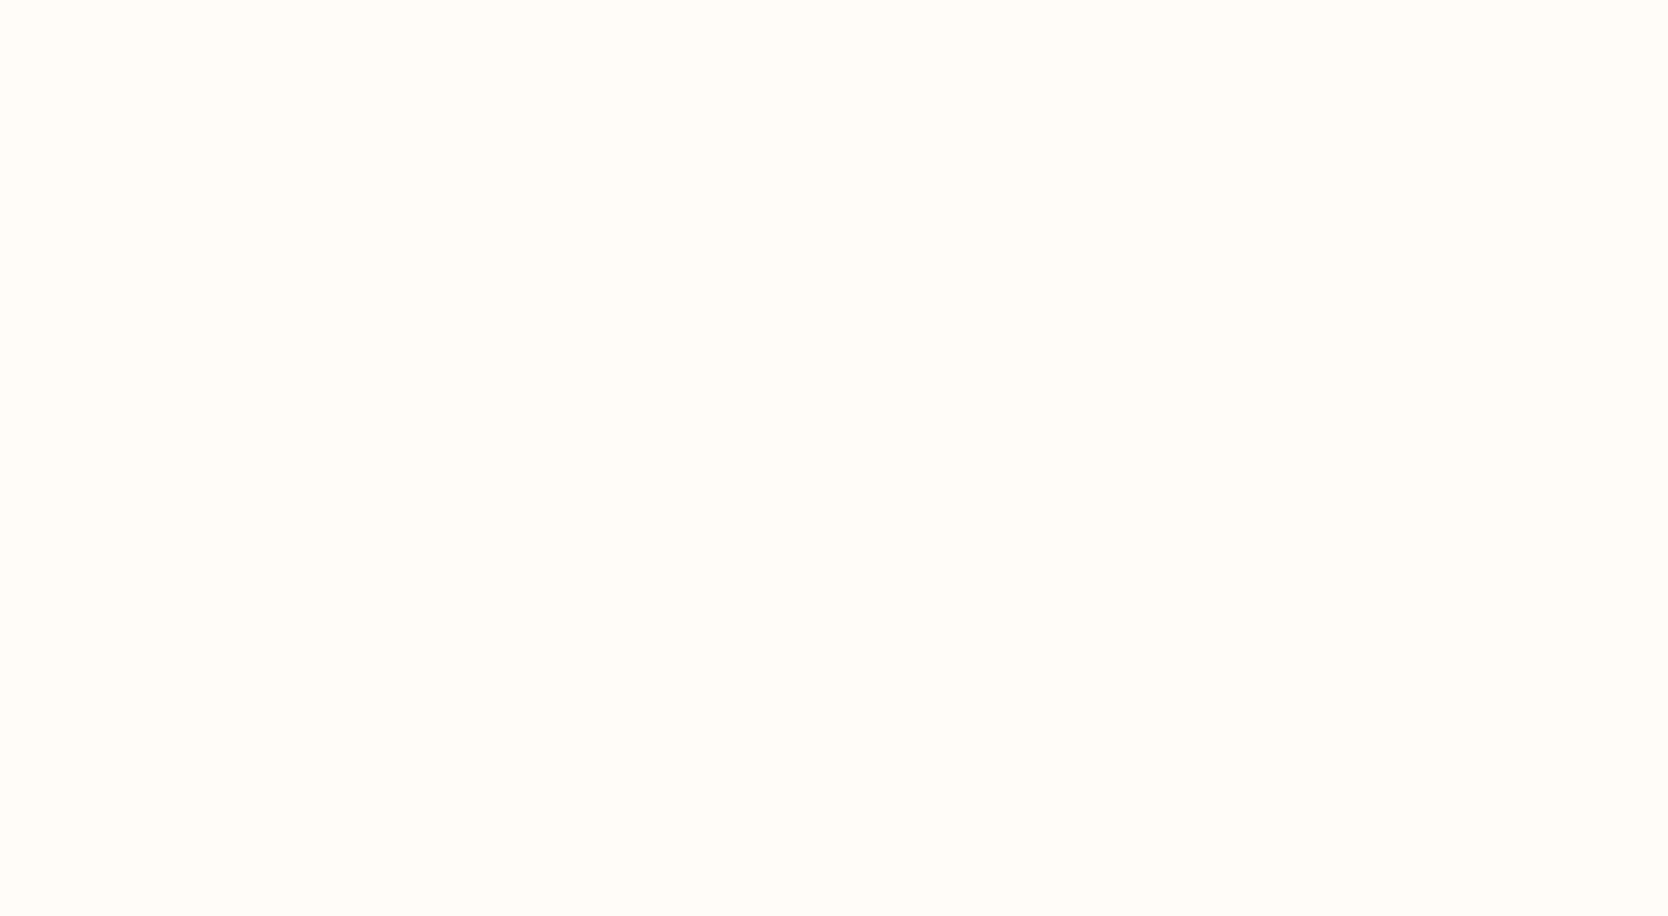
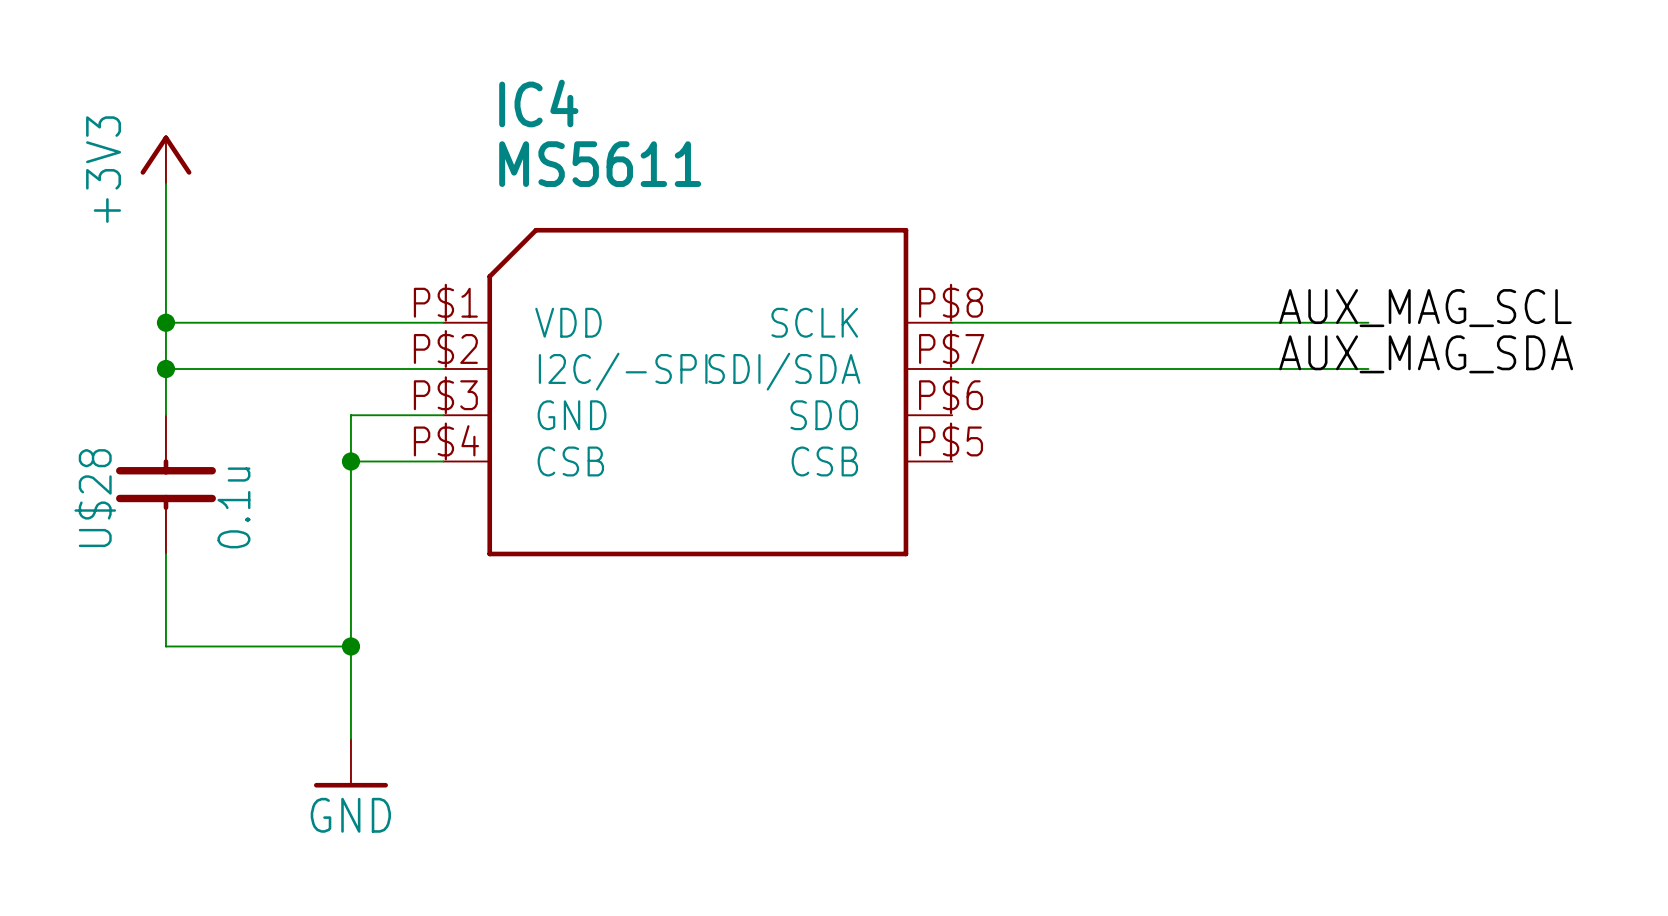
text: none -> IC4 (538, 103)
power symbol: none -> +3V3 (165, 159)
text: none -> MS5611 (600, 164)
wire: none -> (165, 184) (165, 415)
label: none -> AUX_MAG_SCL (1425, 308)
wire: none -> (165, 322) (443, 322)
junction: none -> (165, 322)
wire: none -> (952, 322) (1368, 322)
label: none -> AUX_MAG_SDA (1426, 354)
wire: none -> (165, 368) (443, 368)
junction: none -> (165, 368)
wire: none -> (952, 368) (1368, 368)
part: none -> (697, 392)
wire: none -> (443, 415) (350, 415) (350, 738)
wire: none -> (350, 461) (443, 461)
junction: none -> (350, 461)
U$28: none -> 0.1u (165, 484)
wire: none -> (165, 553) (165, 646) (350, 646)
junction: none -> (350, 646)
power symbol: none -> GND (350, 763)

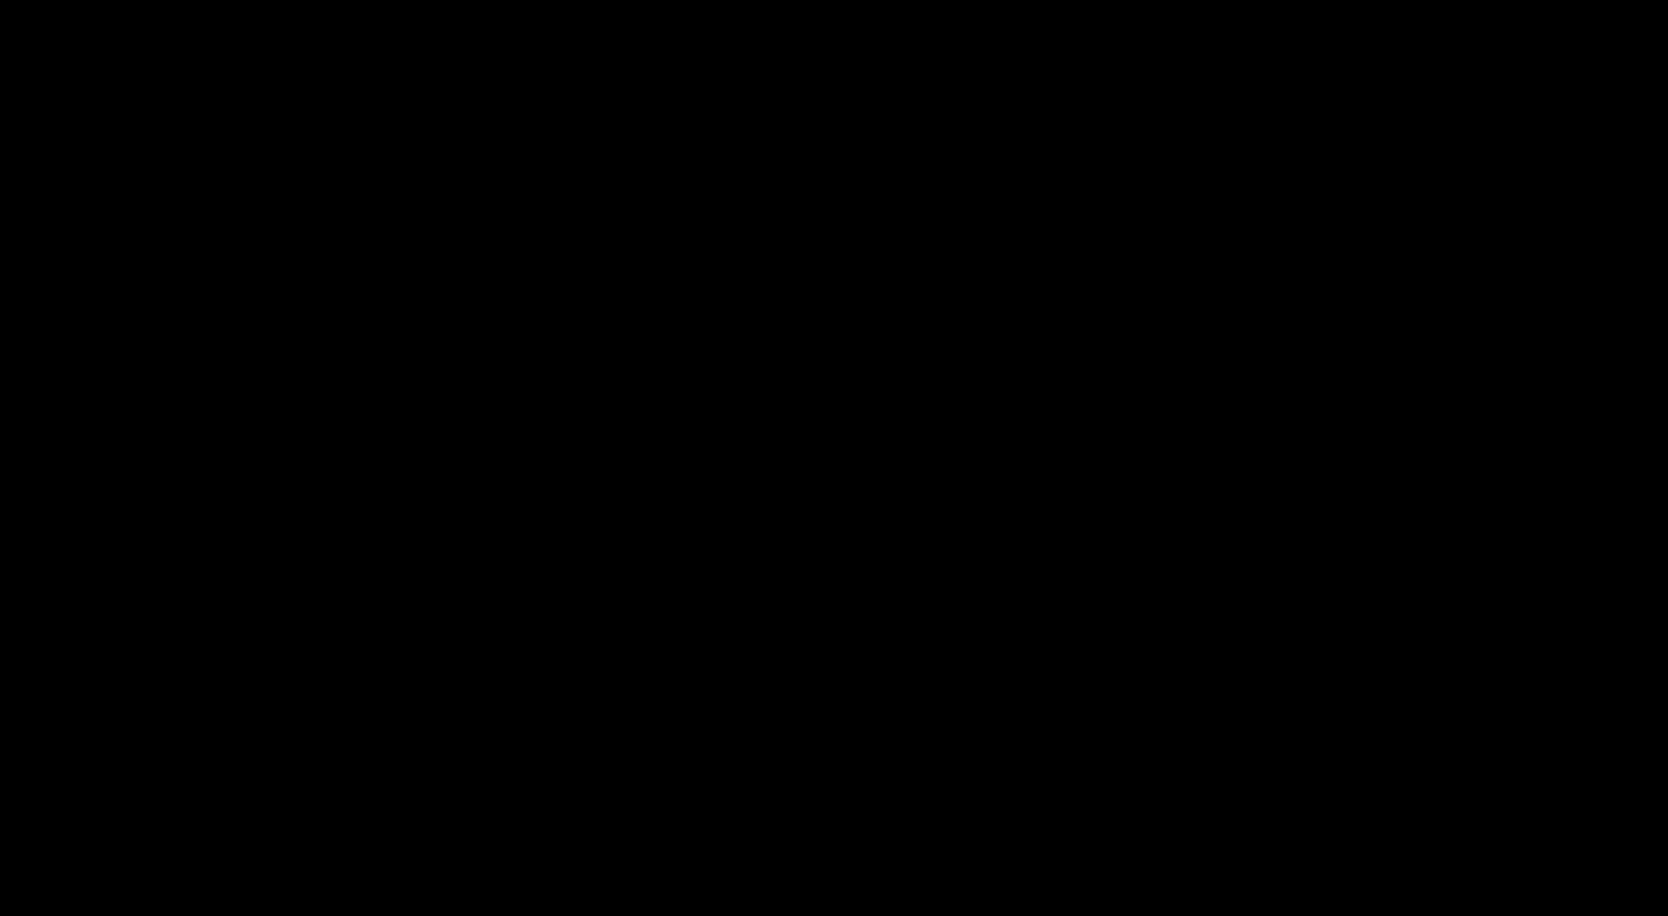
text: IC4 (538, 103) -> none
power symbol: +3V3 (165, 159) -> none
text: MS5611 (600, 164) -> none
wire: (165, 184) (165, 415) -> none
label: AUX_MAG_SCL (1425, 308) -> none
wire: (165, 322) (443, 322) -> none
junction: (165, 322) -> none
wire: (952, 322) (1368, 322) -> none
label: AUX_MAG_SDA (1426, 354) -> none
wire: (165, 368) (443, 368) -> none
junction: (165, 368) -> none
wire: (952, 368) (1368, 368) -> none
part: (697, 392) -> none
wire: (443, 415) (350, 415) (350, 738) -> none
wire: (350, 461) (443, 461) -> none
junction: (350, 461) -> none
U$28: 0.1u (165, 484) -> none
wire: (165, 553) (165, 646) (350, 646) -> none
junction: (350, 646) -> none
power symbol: GND (350, 763) -> none

